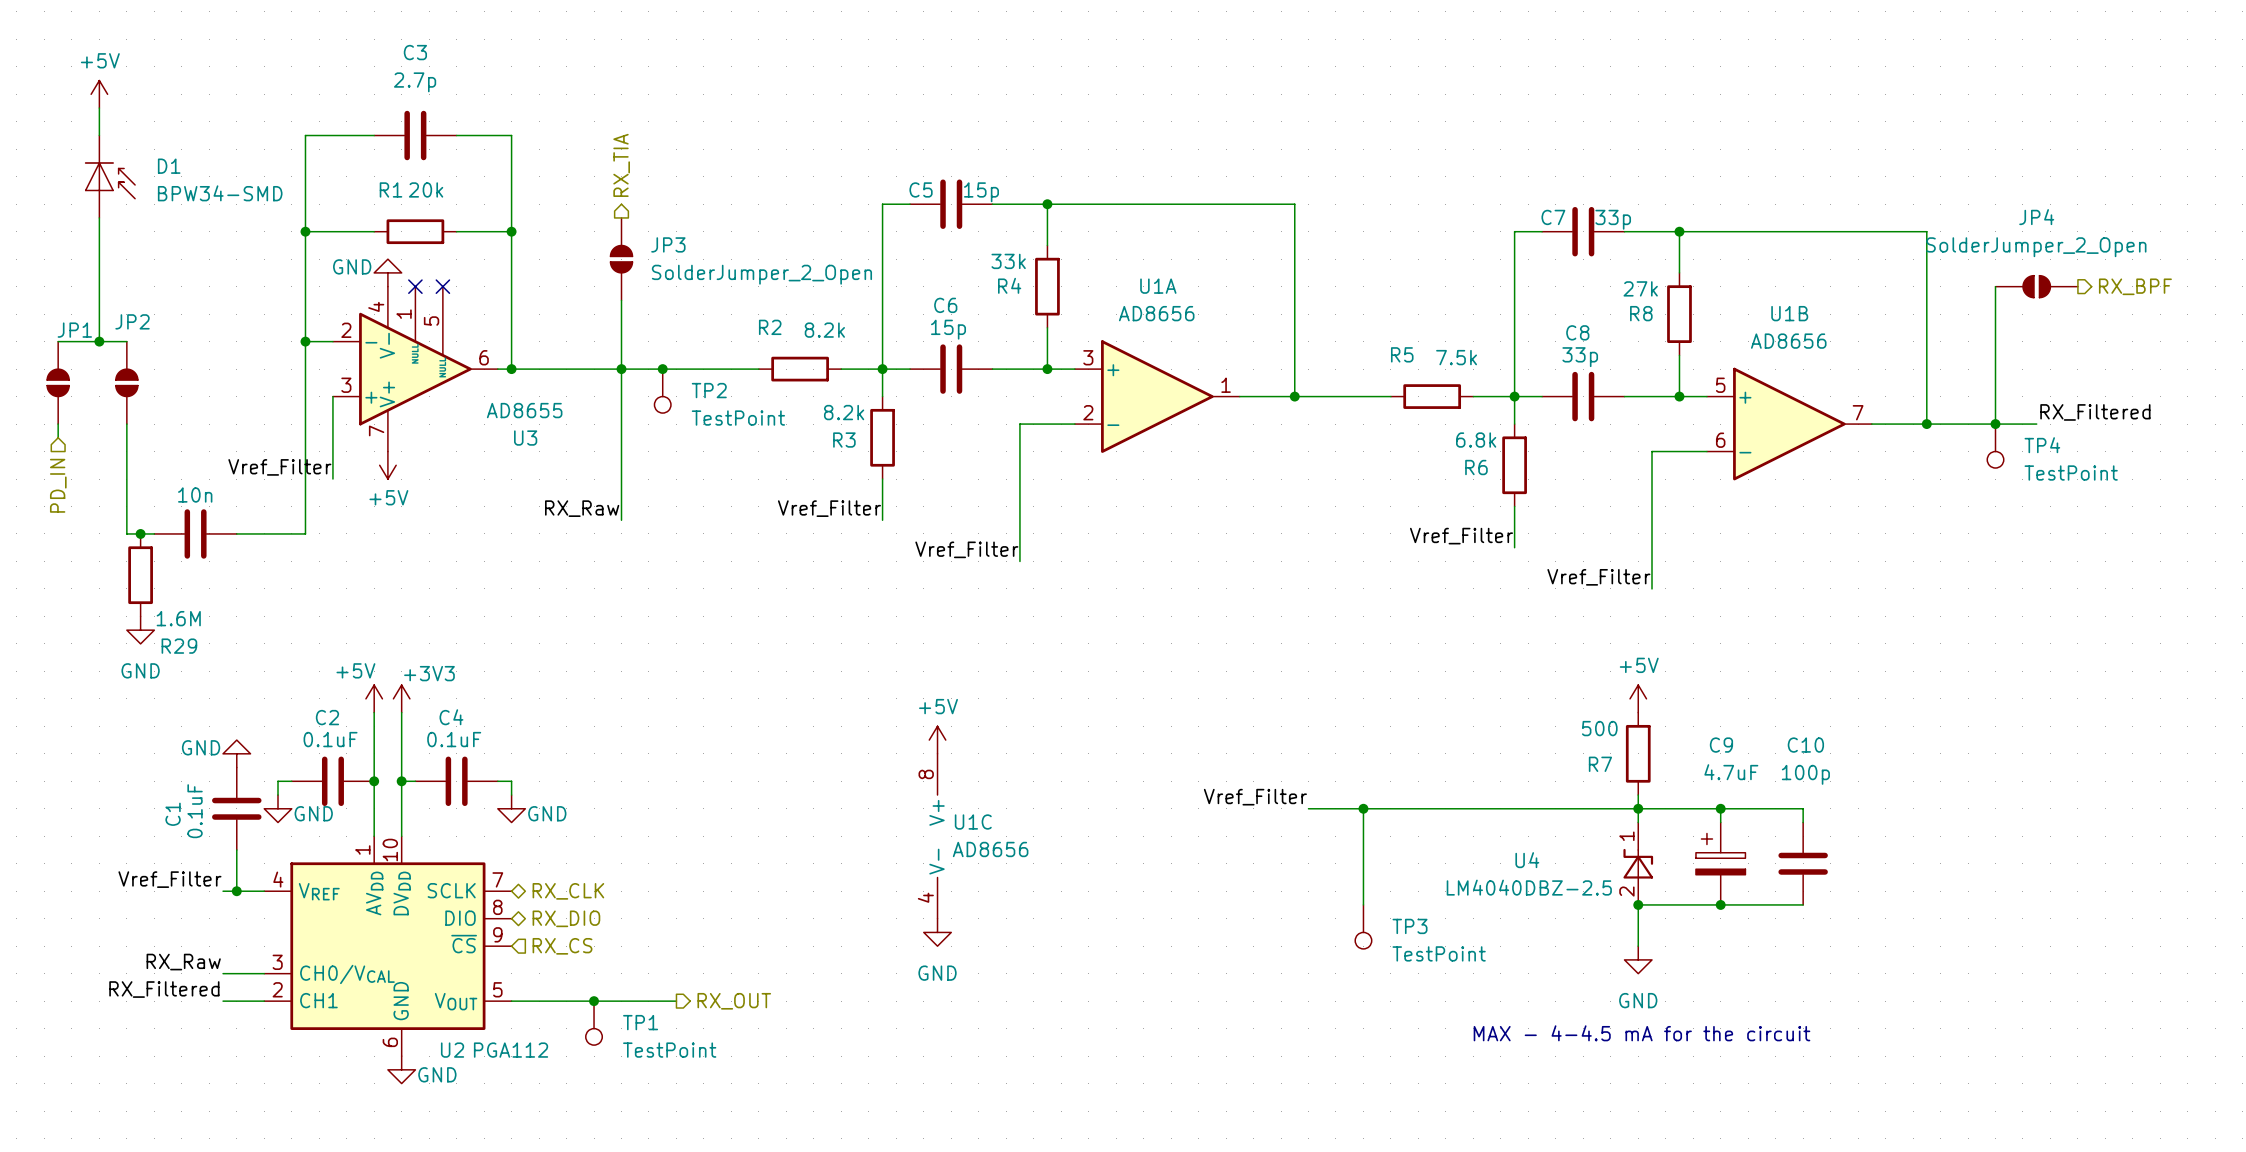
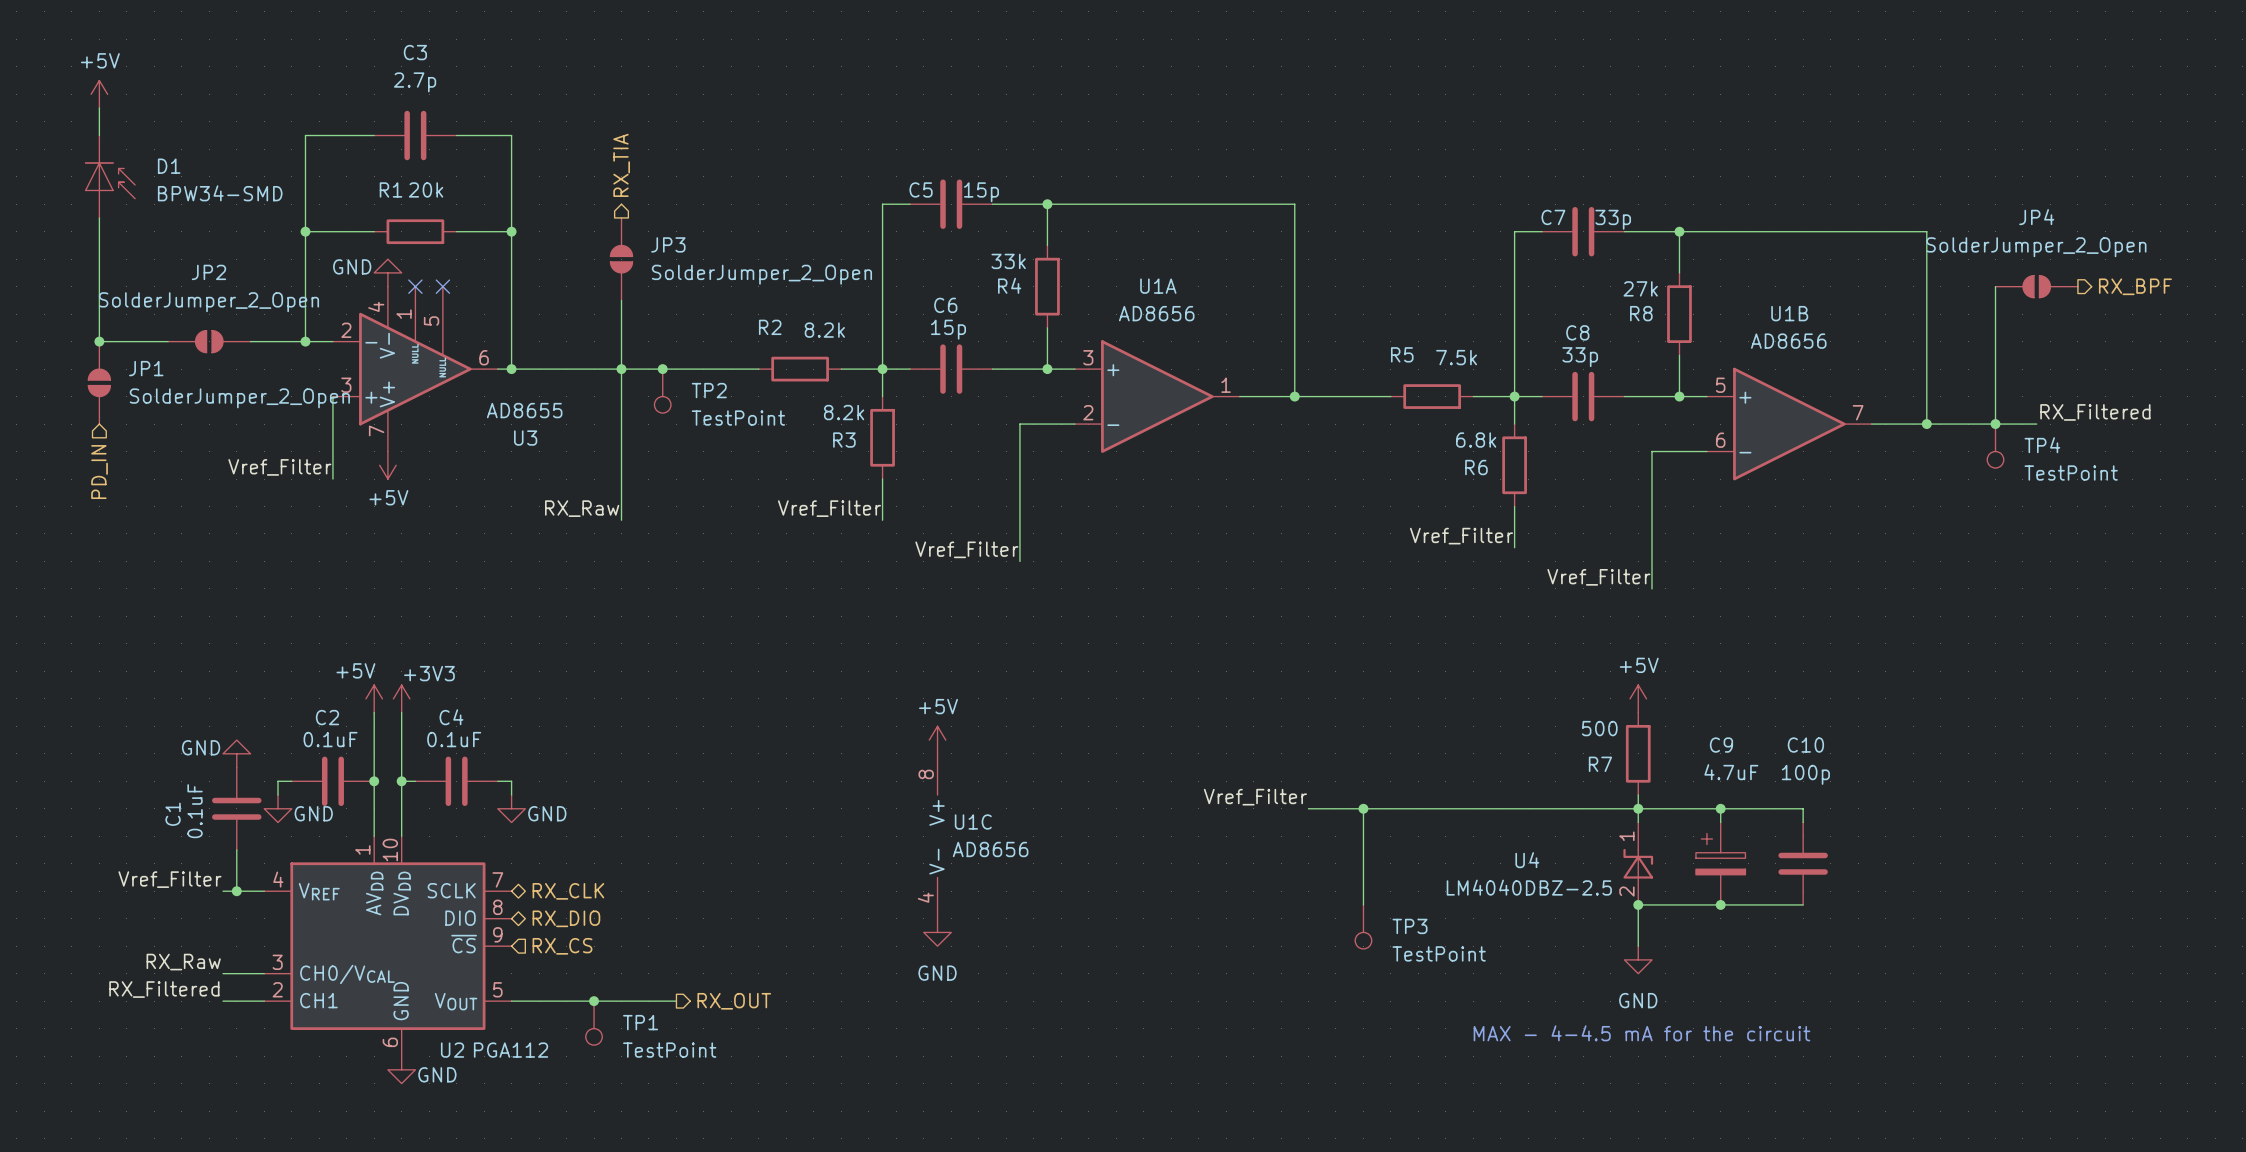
JP2 value: none -> SolderJumper_2_Open (208, 302)
JP1 name position: JP1 (74, 330) -> JP1 (146, 368)
wire: (58, 341) (99, 341) -> (126, 341) (168, 341)
wire: (305, 341) (305, 533) (236, 533) -> (305, 341) (250, 341)
JP1 position: (58, 382) -> (99, 382)
JP2 rotation: 0° (126, 382) -> 90° clockwise (209, 341)
JP2 position: (126, 382) -> (209, 341)
JP1 value: none -> SolderJumper_2_Open (239, 398)
wire: (58, 424) (58, 437) -> none
wire: (126, 424) (126, 533) (154, 533) -> none
hierarchical label position: PD_IN (58, 485) -> PD_IN (99, 472)
junction: (140, 533) -> none
part: 10n (195, 533) -> none
R29: 1.6M (140, 575) -> none
power symbol: GND (140, 630) -> none

